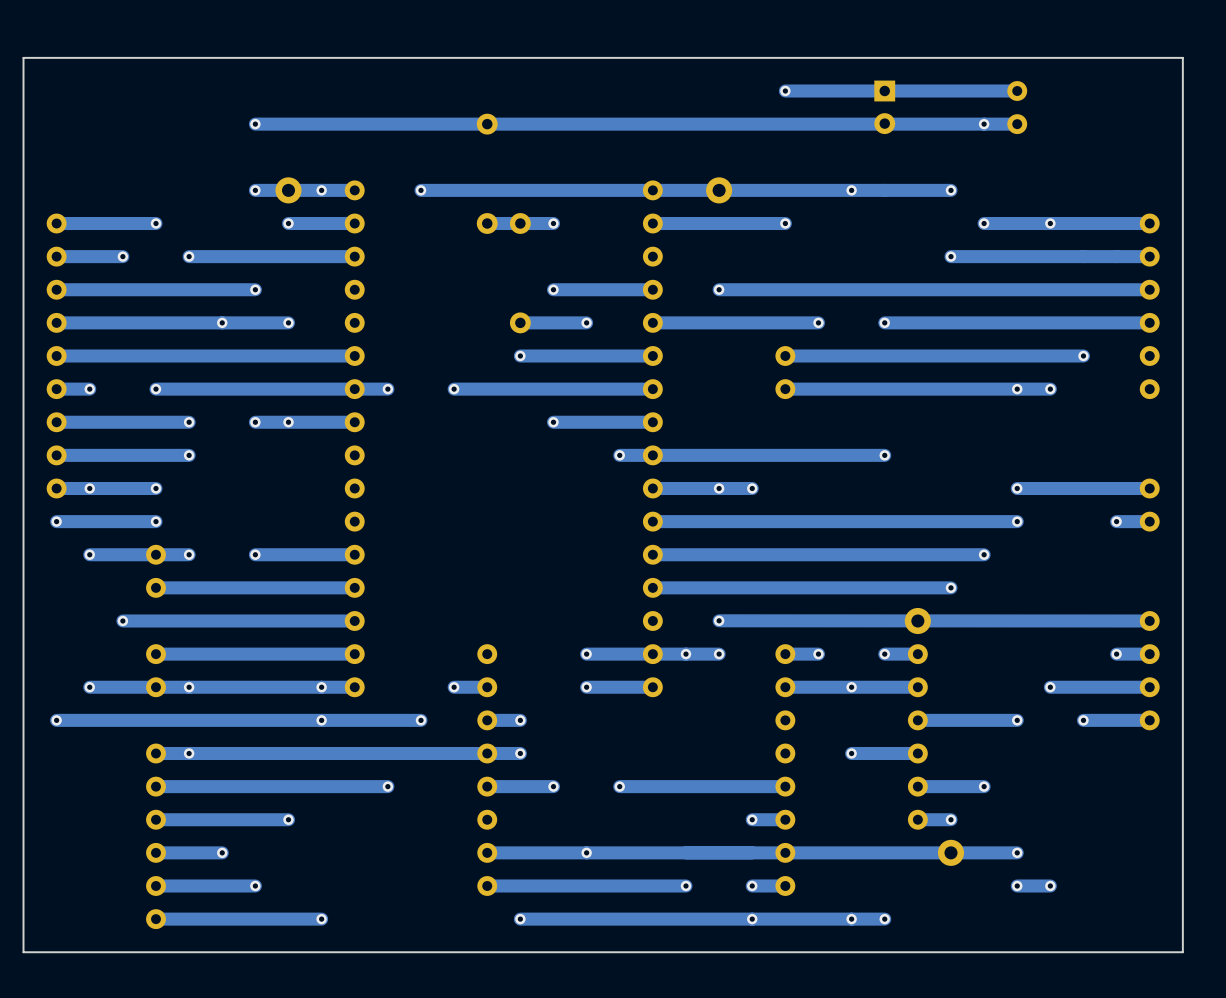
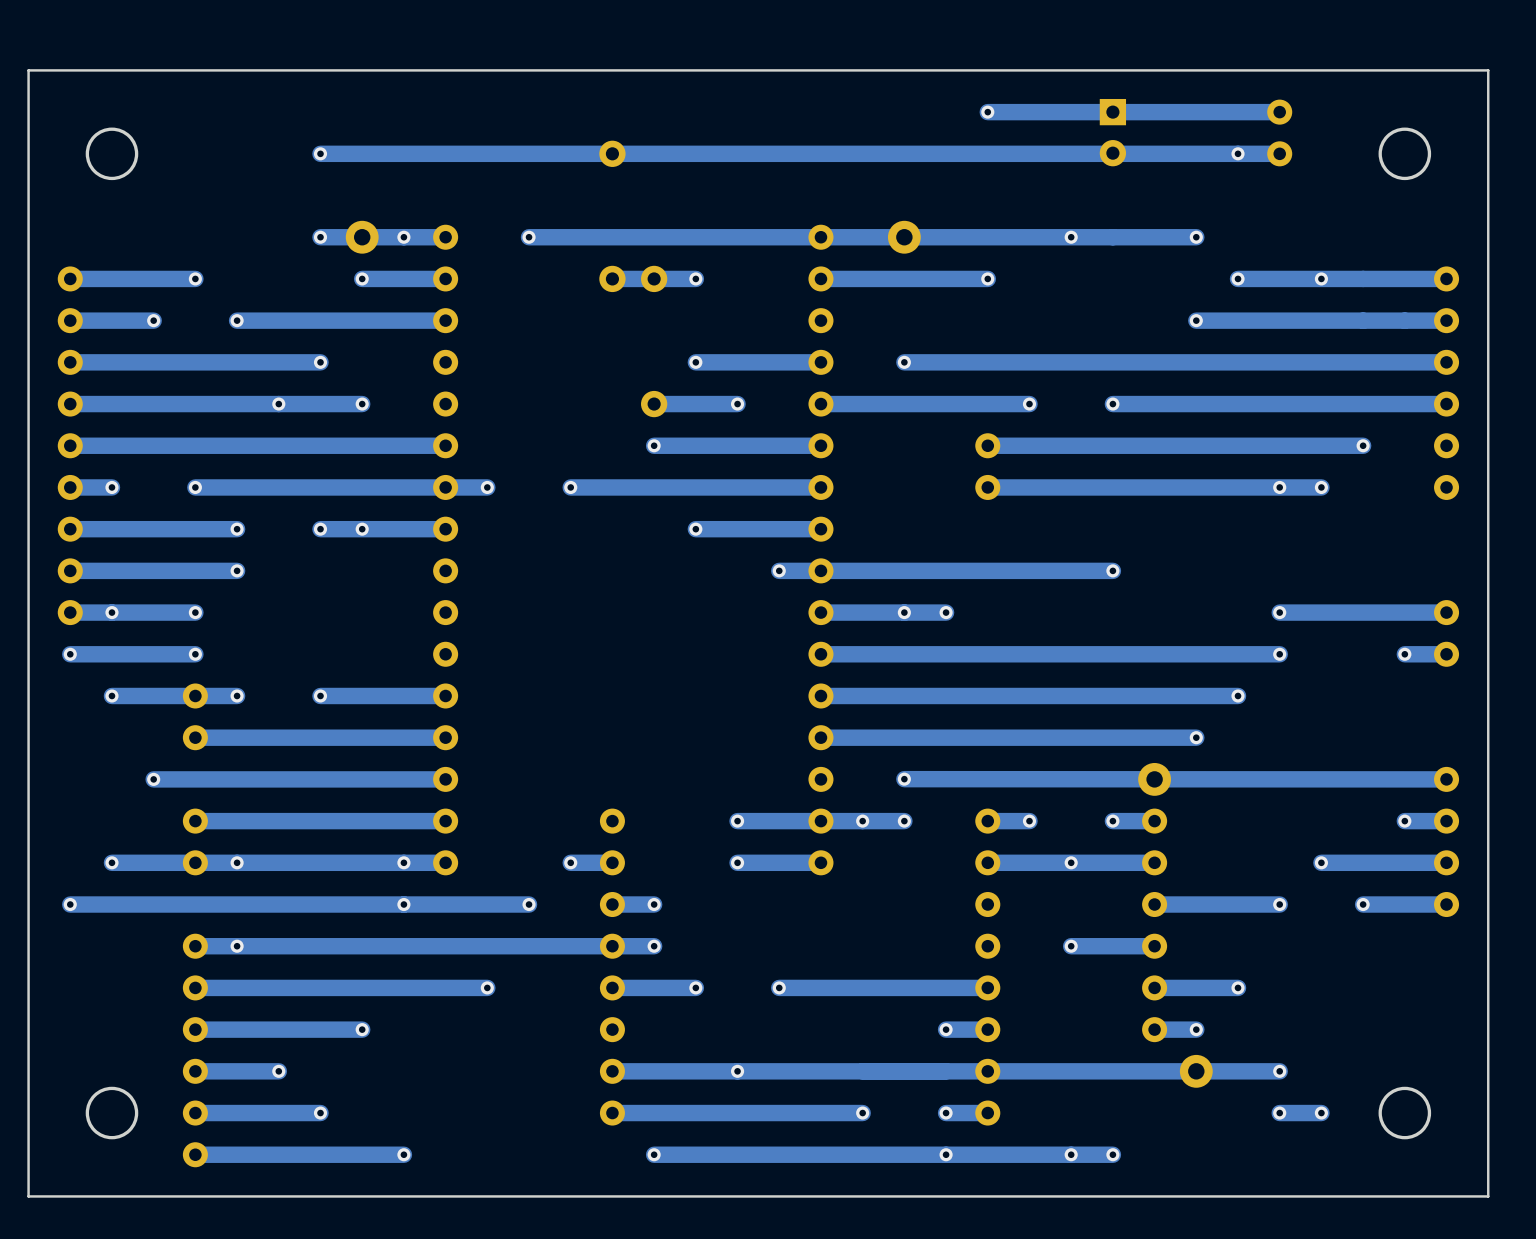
round board edge: none -> [85, 127, 139, 181]
round board edge: none -> [1378, 127, 1432, 181]
round board edge: none -> [85, 1086, 139, 1140]
round board edge: none -> [1378, 1086, 1432, 1140]

